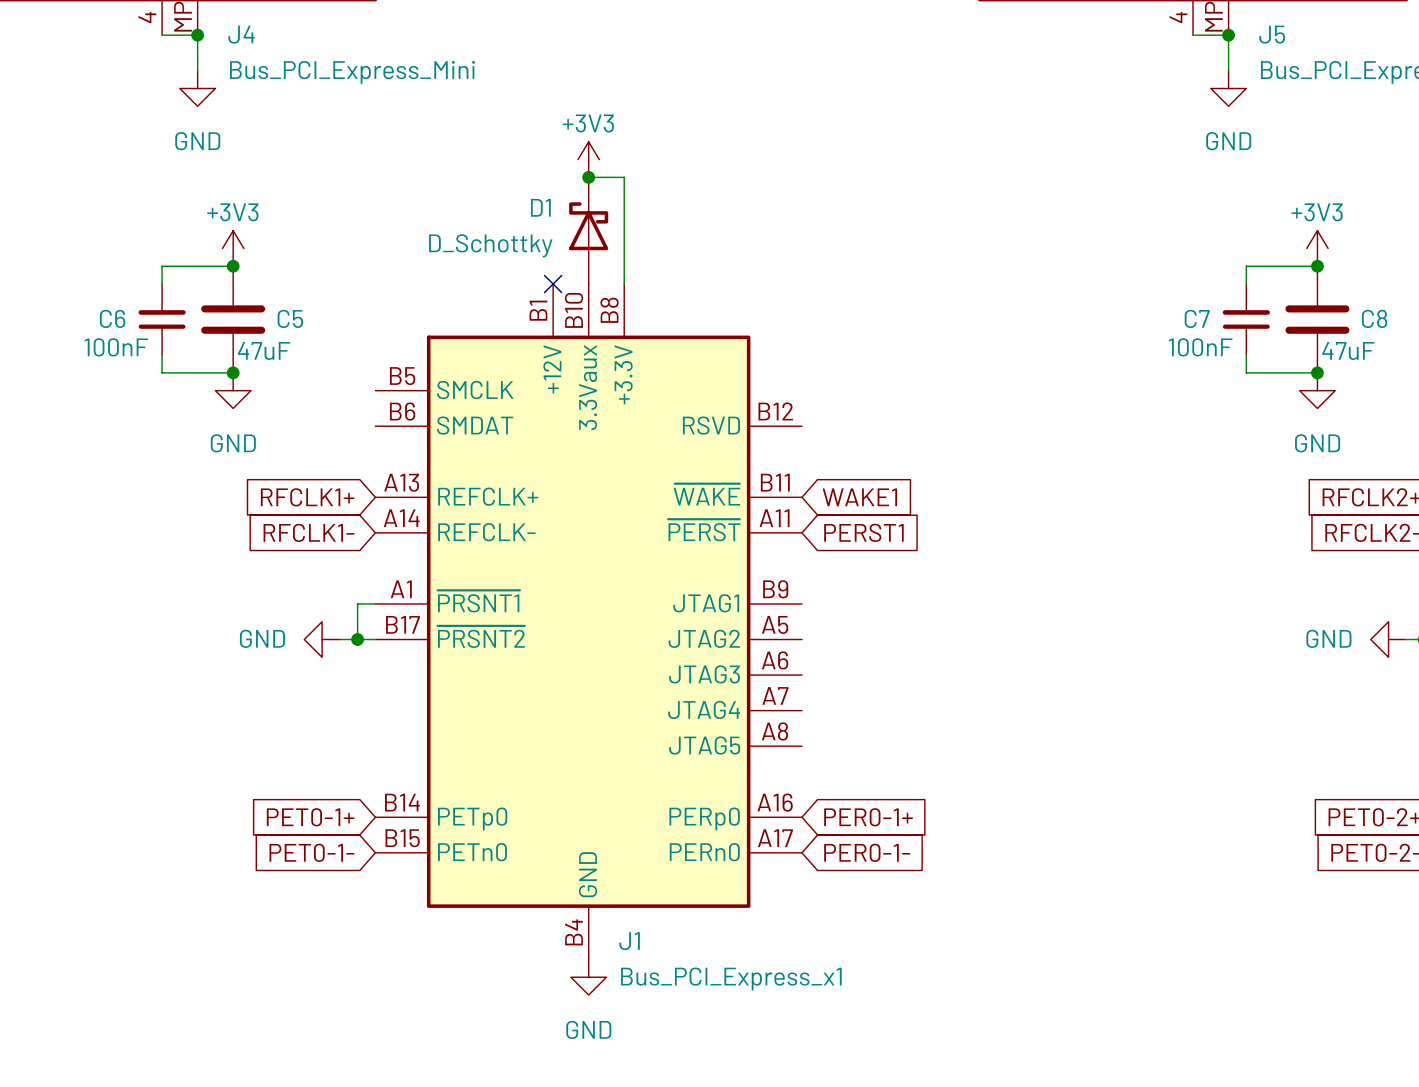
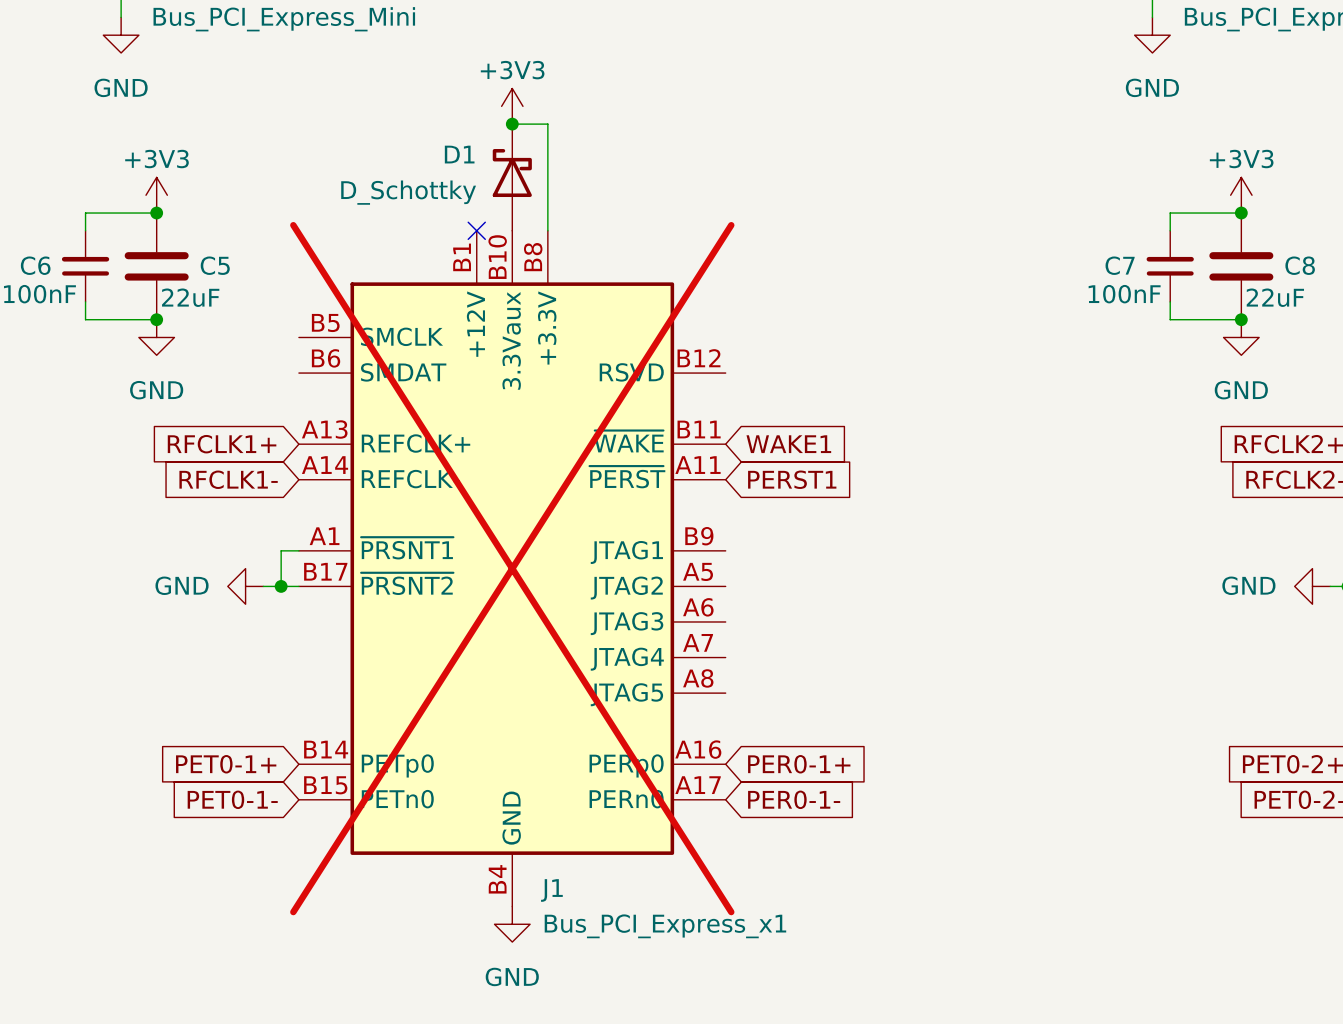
C5 value: 47uF (264, 350) -> 22uF (190, 297)
C8 value: 47uF (1348, 350) -> 22uF (1275, 297)
J1 do-not-place cross: none -> (512, 568)

